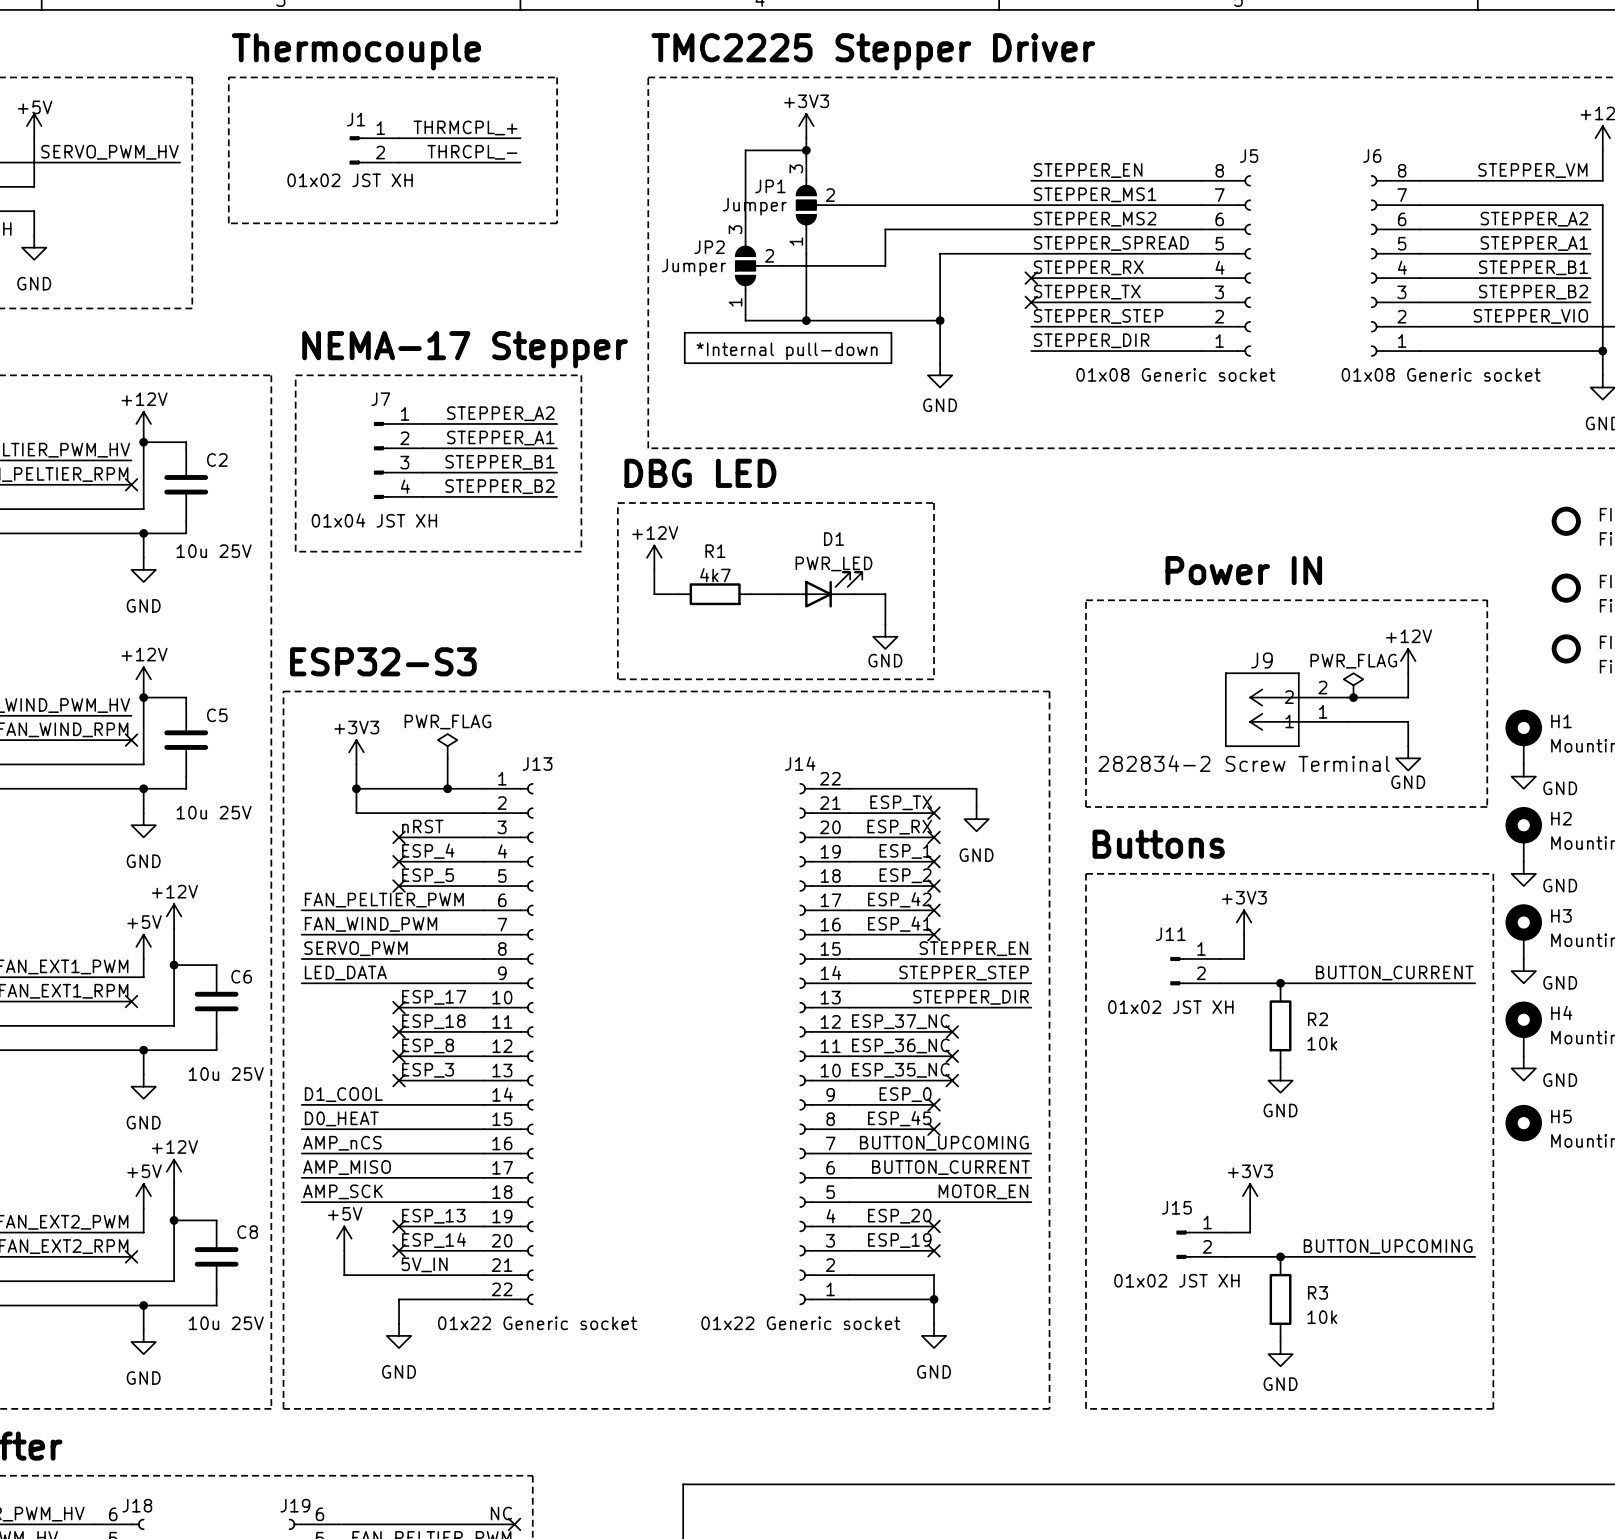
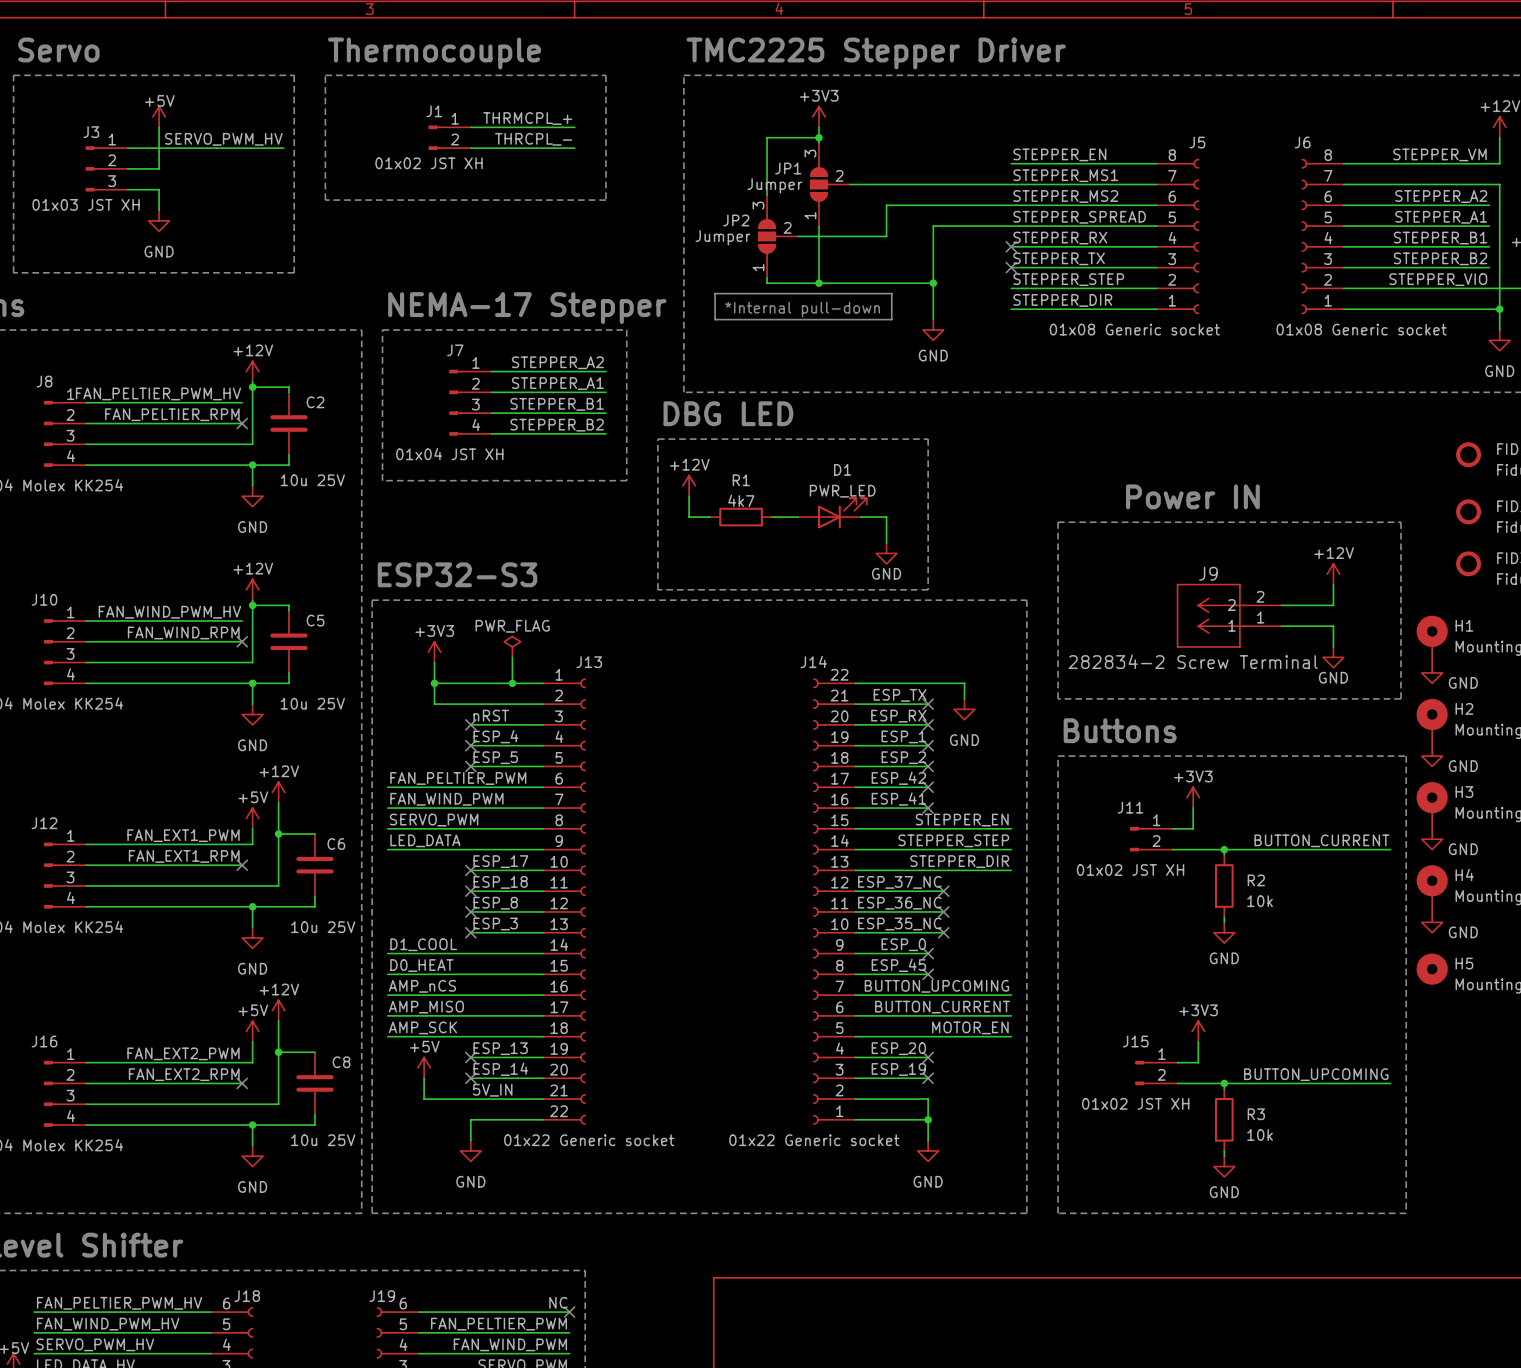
power symbol: PWR_FLAG (1353, 685) -> none
junction: (1353, 697) -> none

